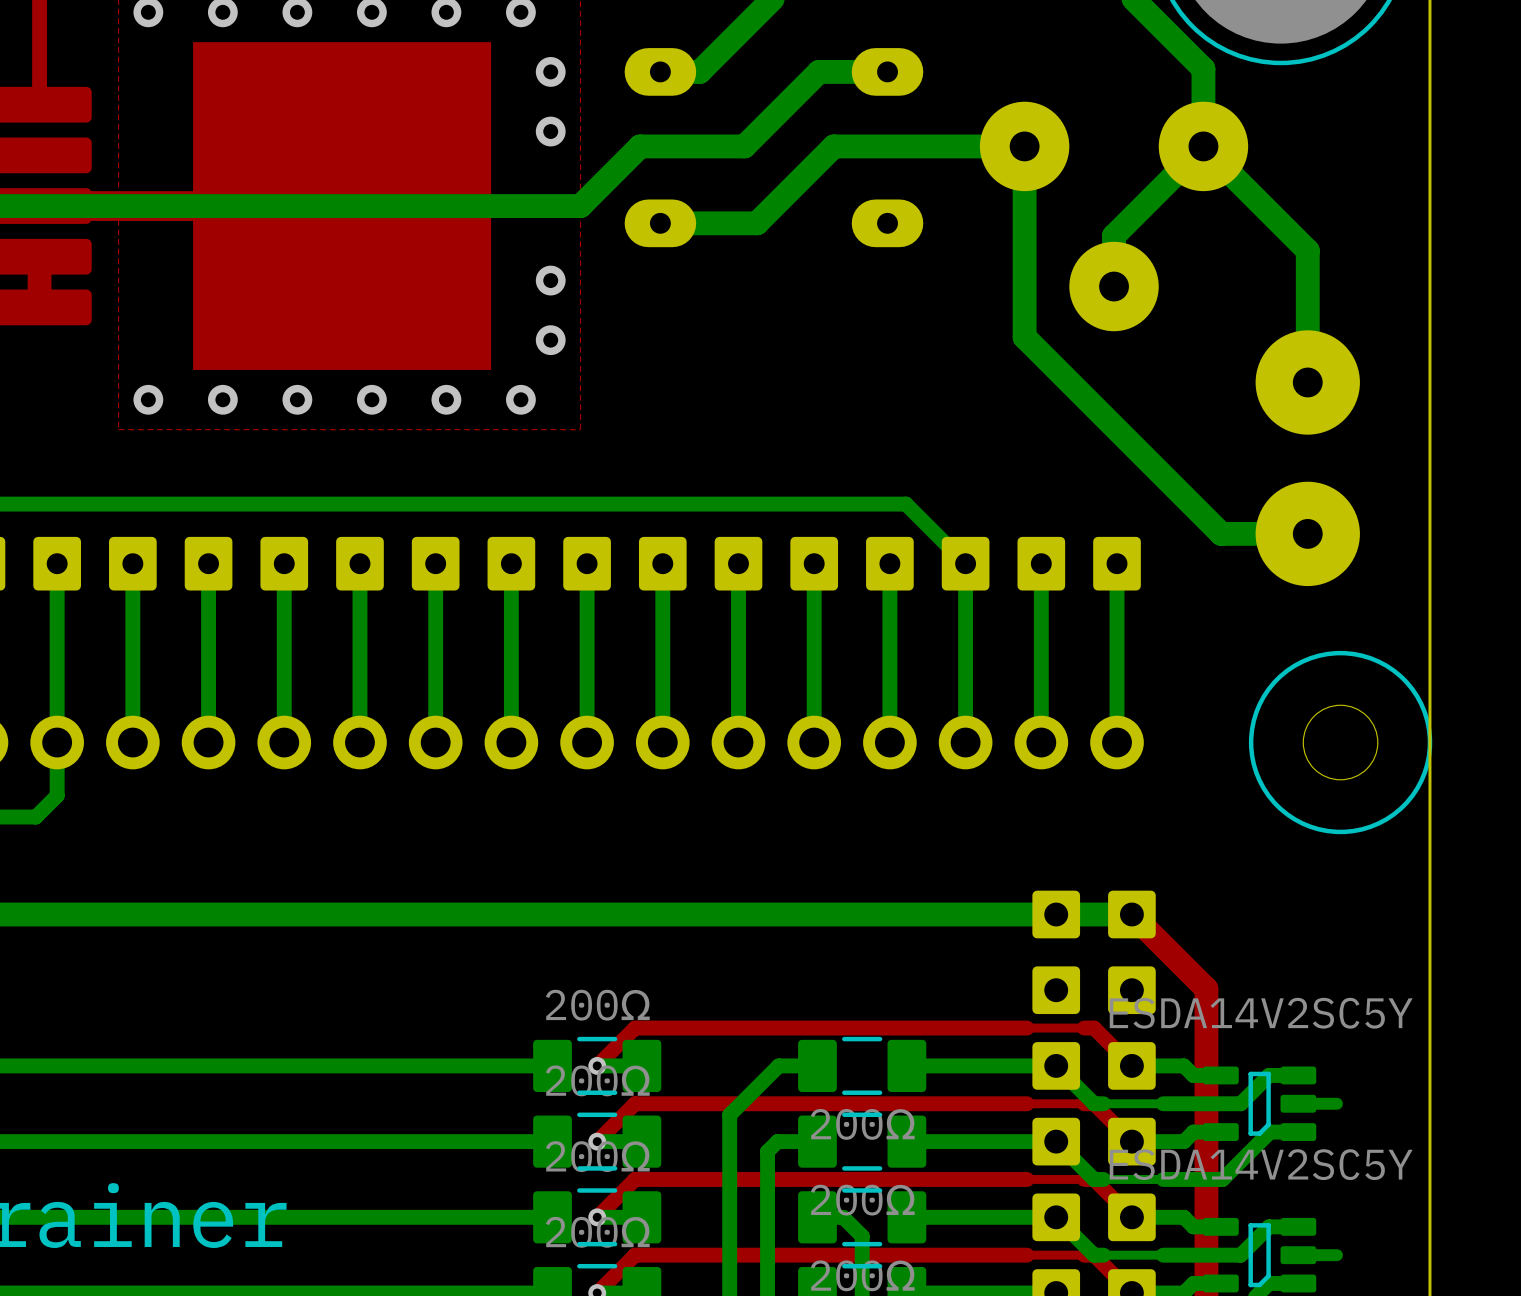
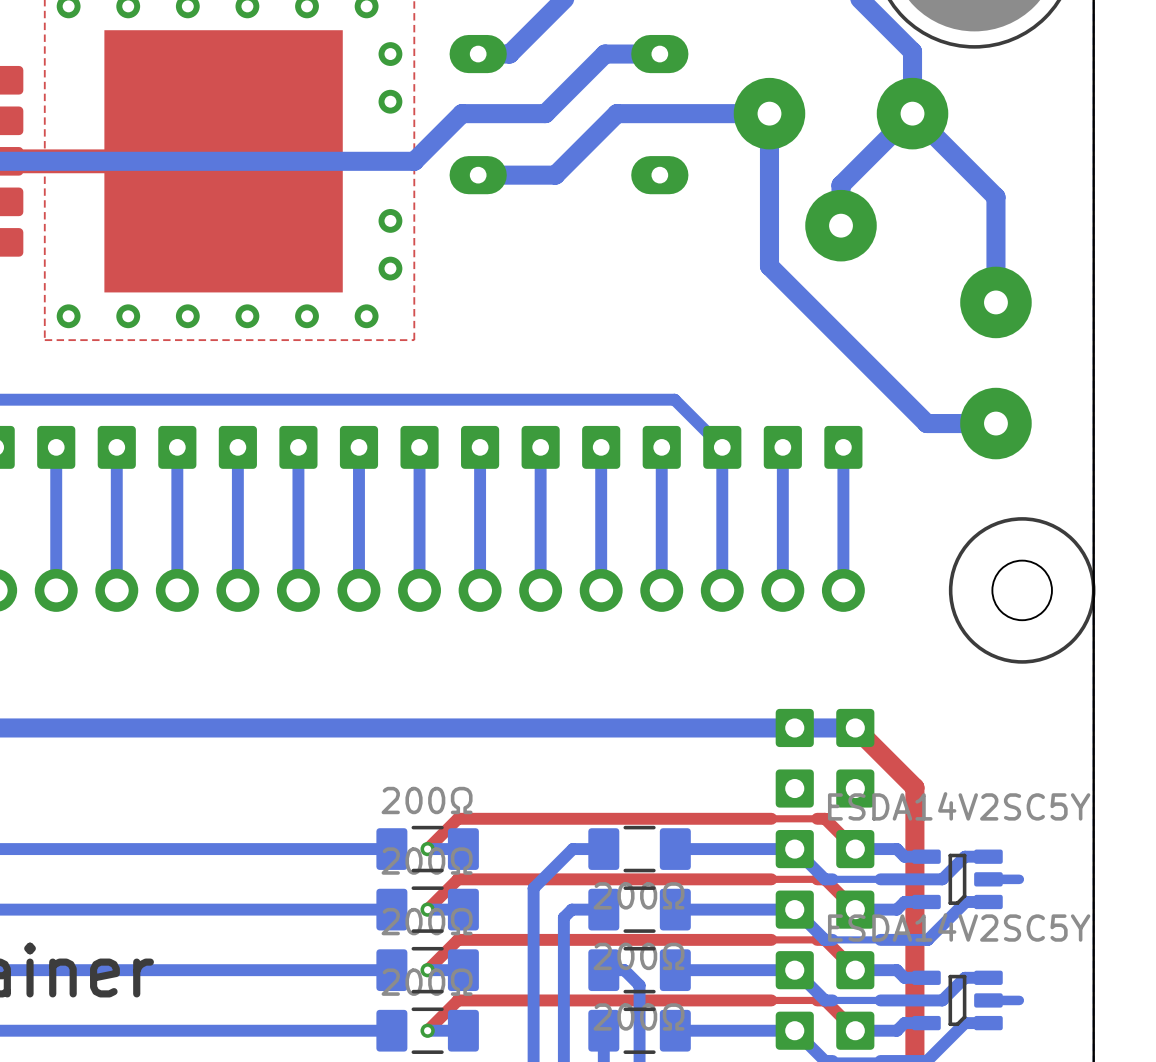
part footprint: [1255, 330, 1360, 587] -> [960, 266, 1032, 460]

